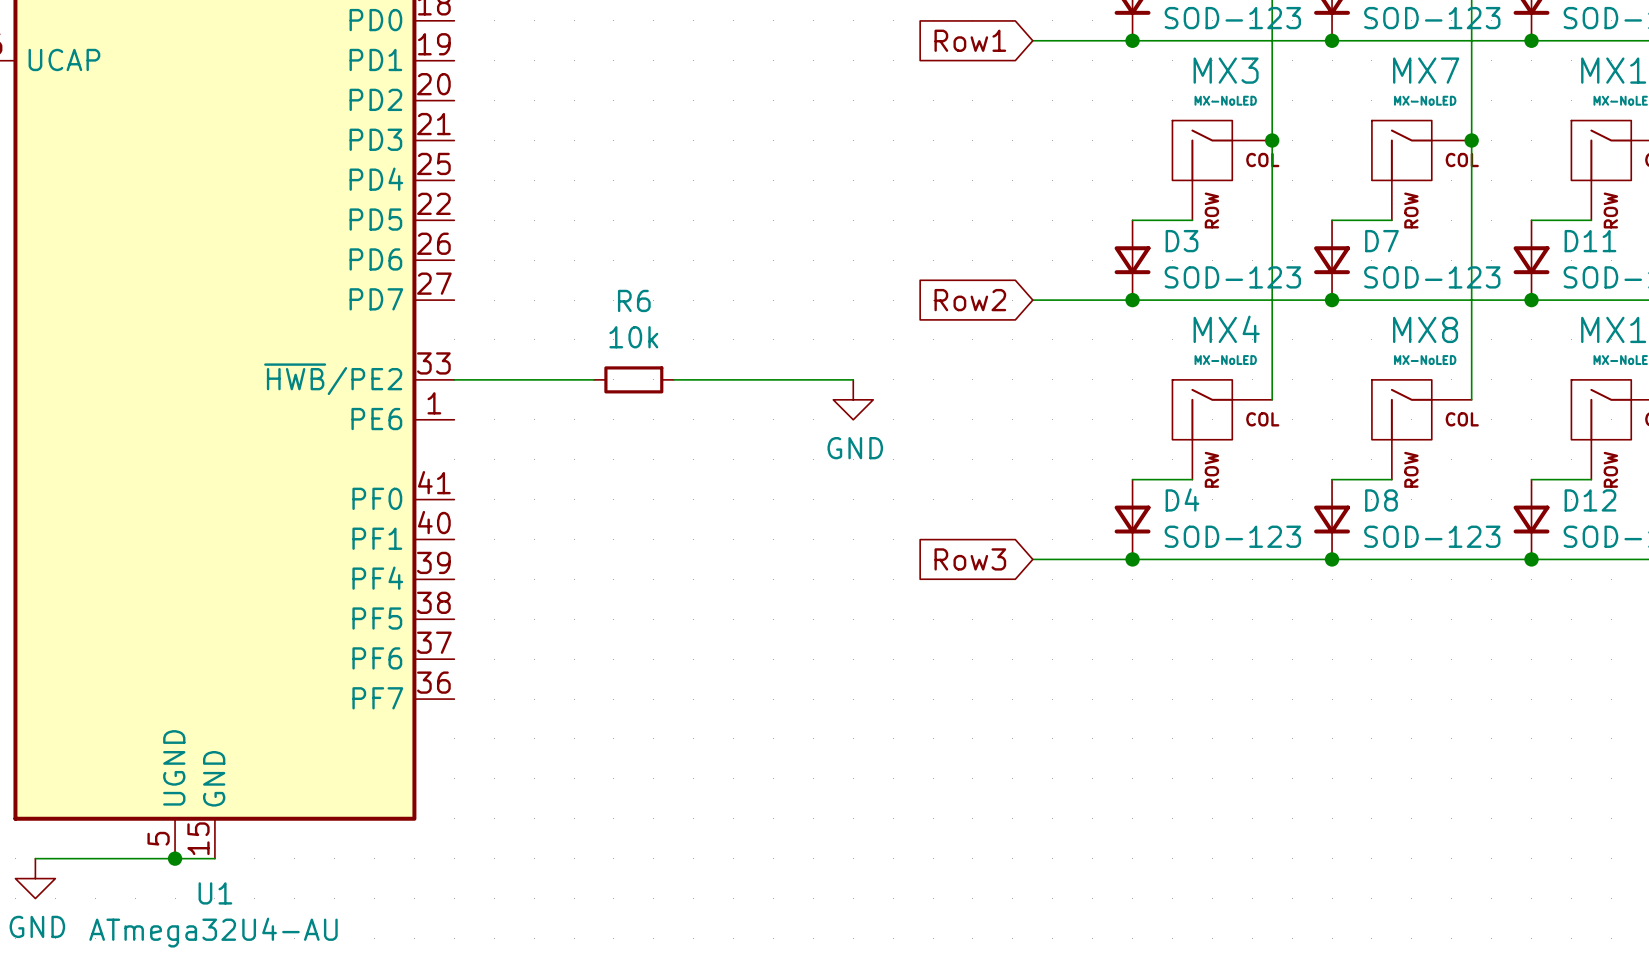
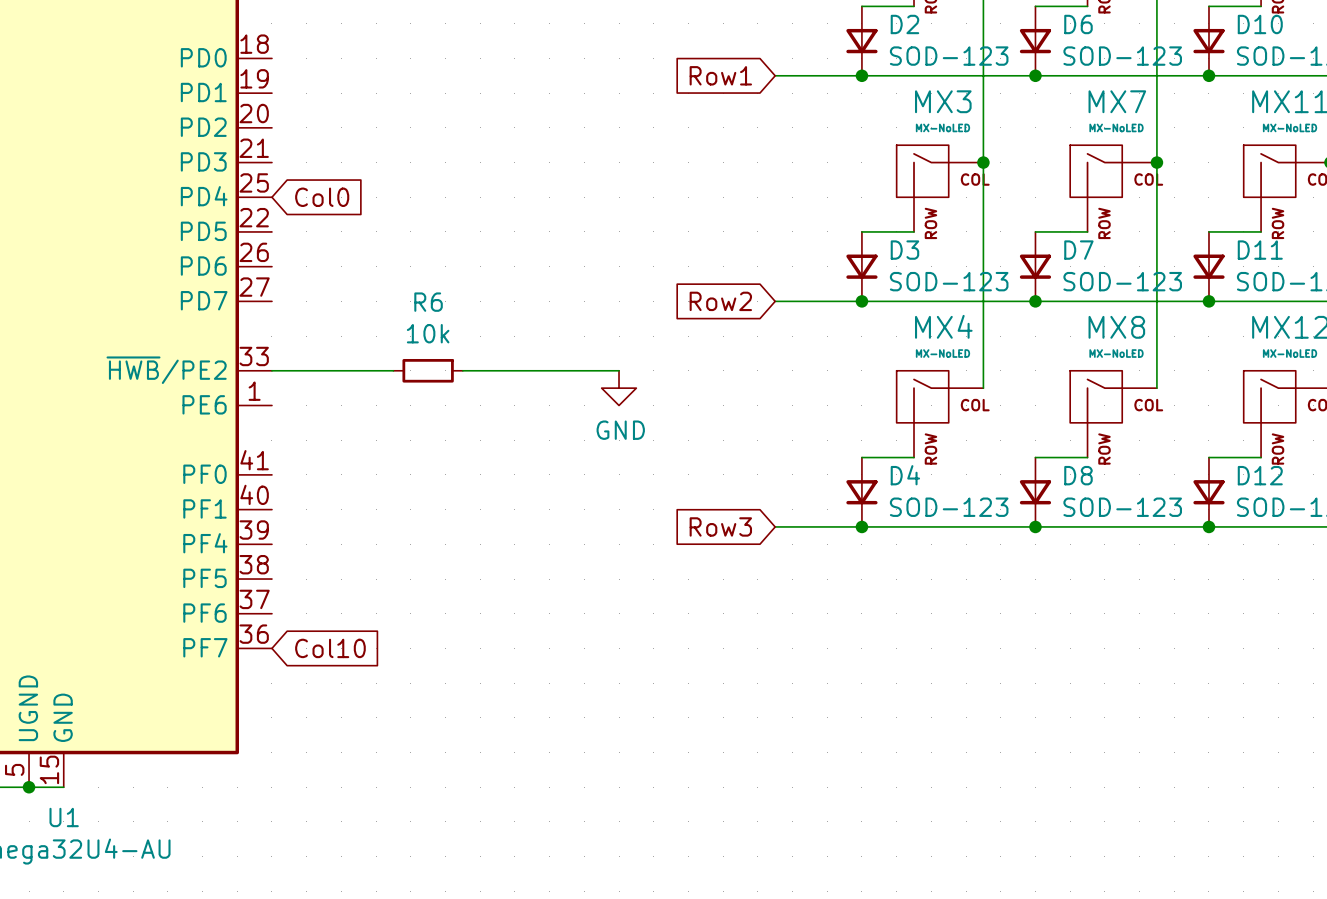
global label: none -> Col0 (322, 197)
global label: none -> Col10 (330, 648)

